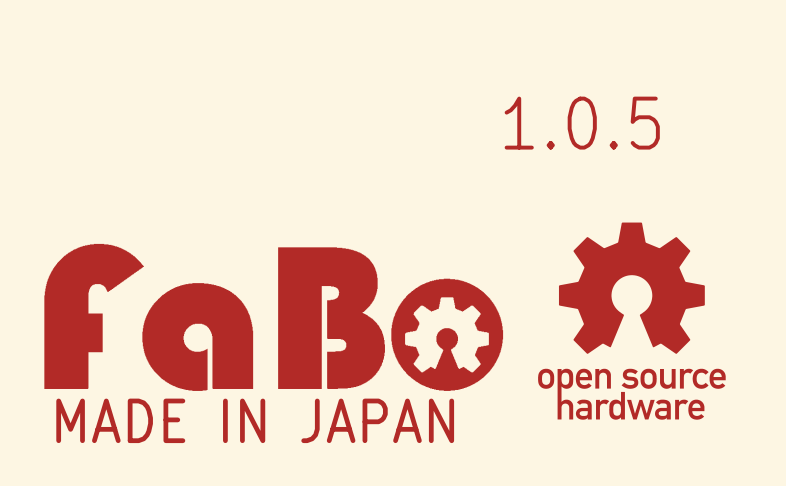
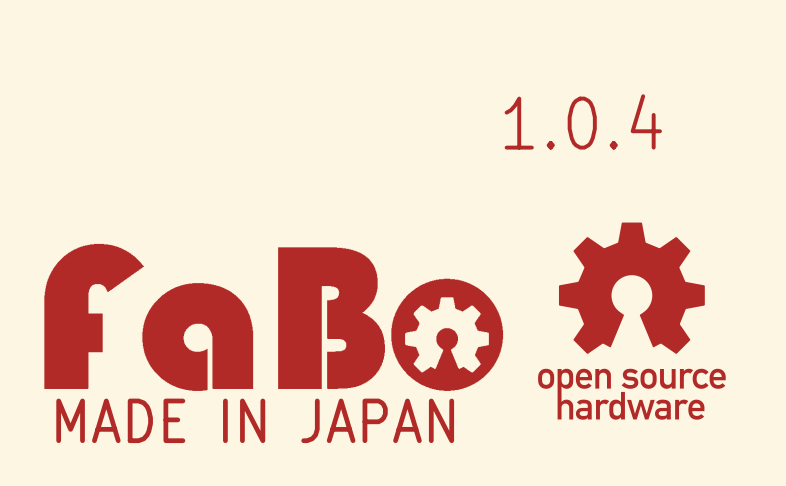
text: 1.0.5 (582, 123) -> 1.0.4 (583, 121)

